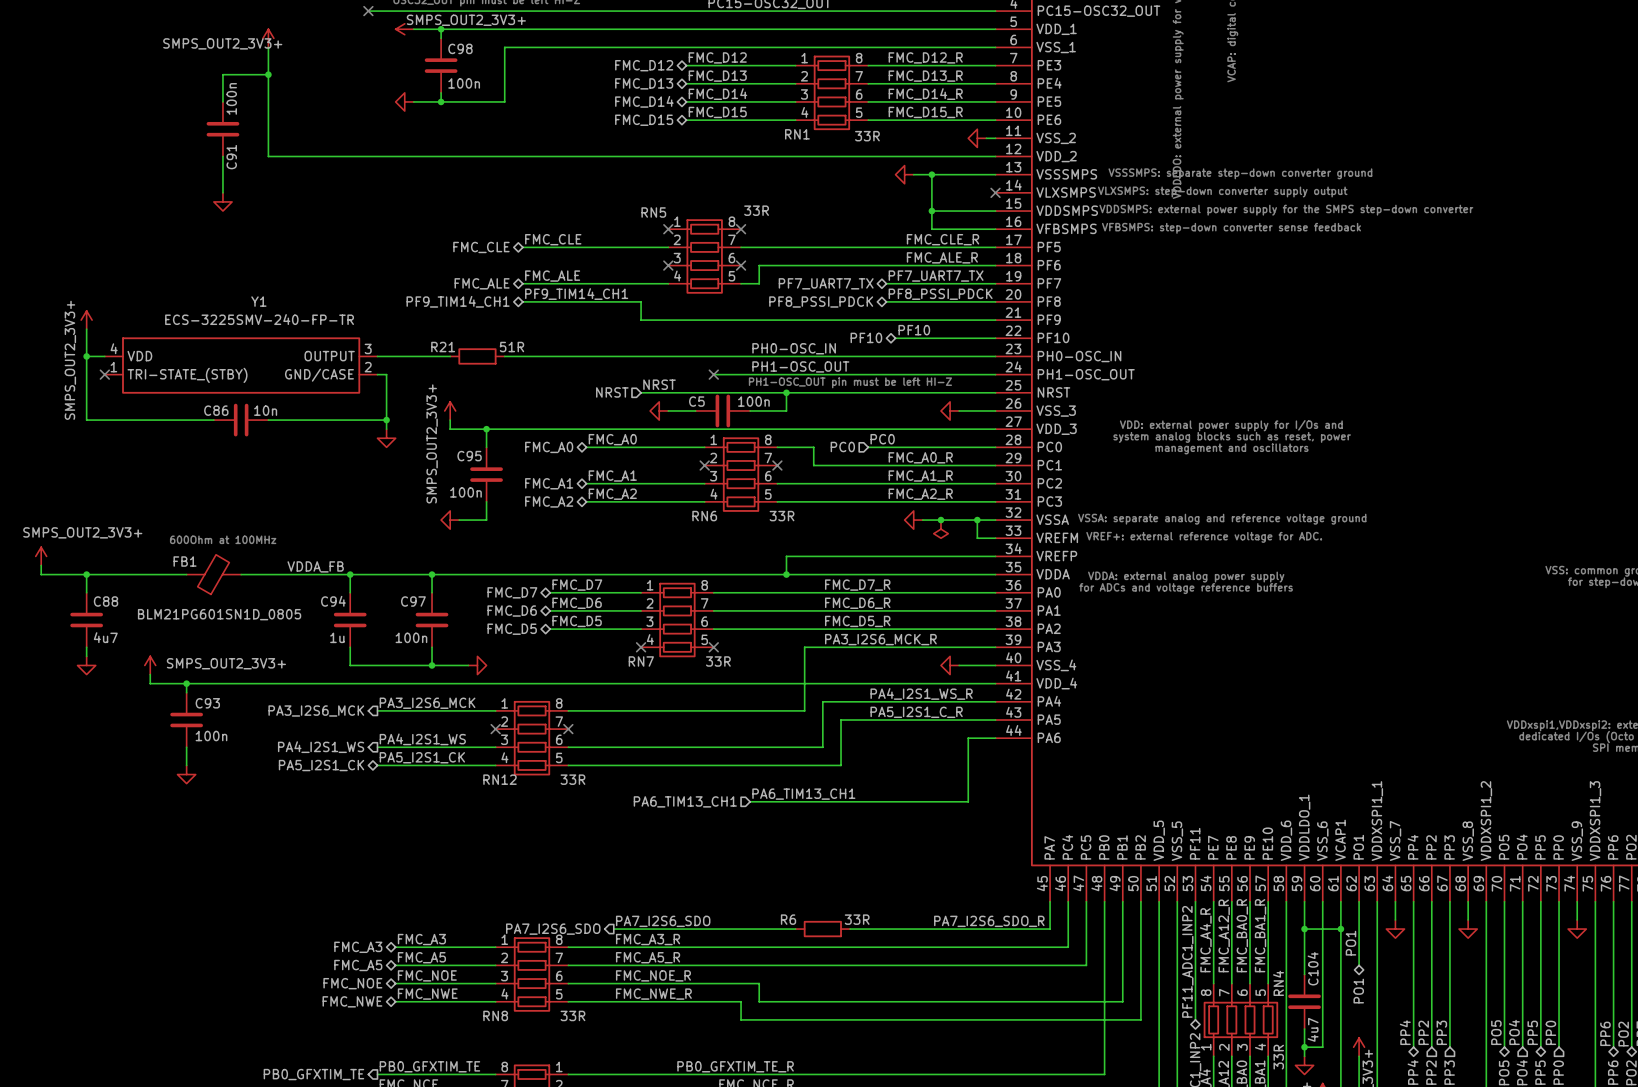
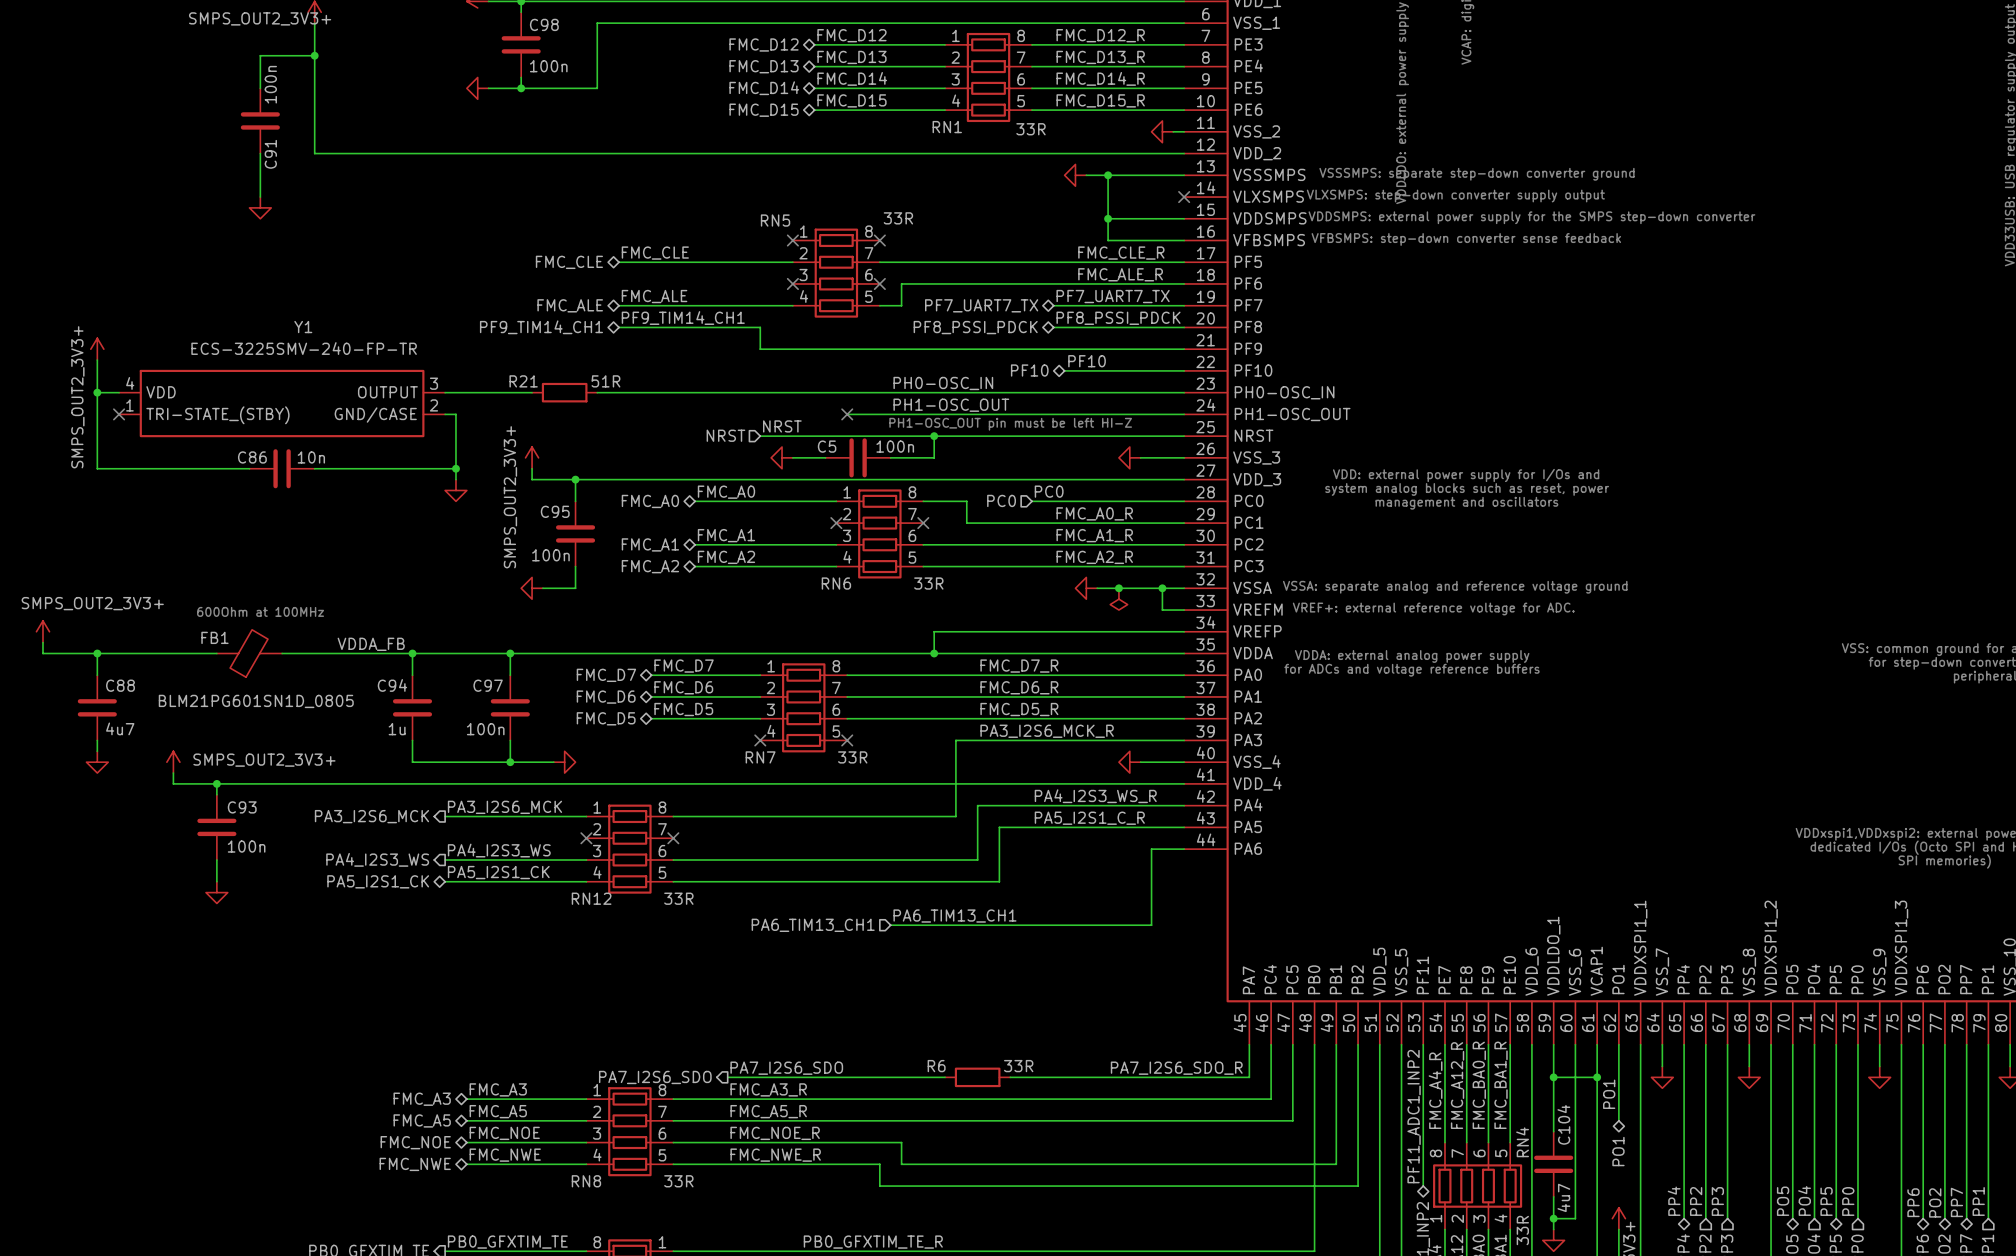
label: PA4_I2S1_WS_R (921, 693) -> PA4_I2S3_WS_R (1095, 796)
label: PA4_I2S1_WS (422, 739) -> PA4_I2S3_WS (499, 850)
hierarchical label: PA4_I2S1_WS (321, 747) -> PA4_I2S3_WS (377, 859)

